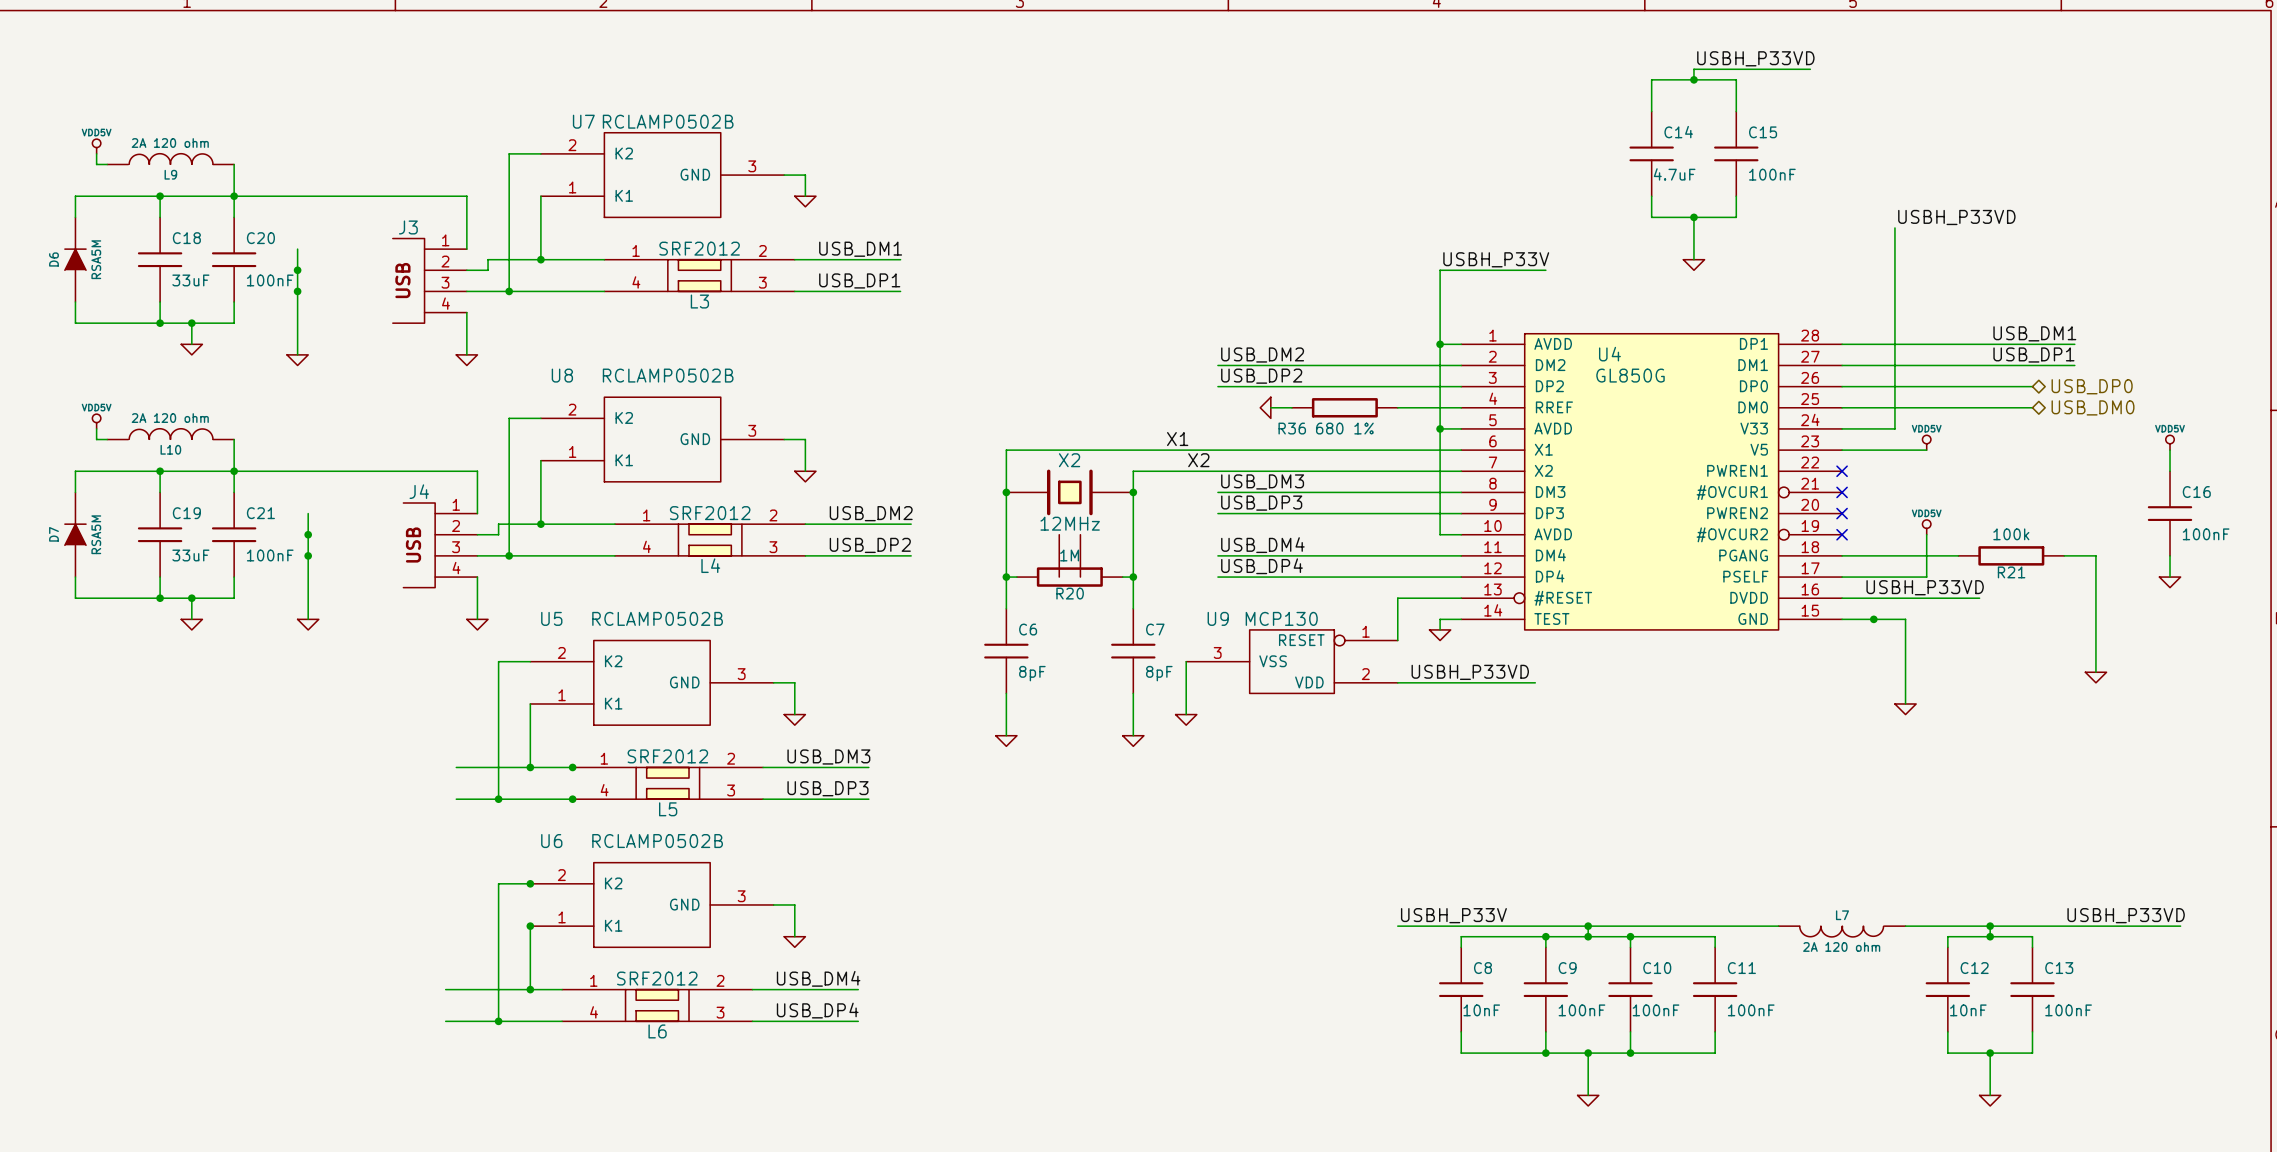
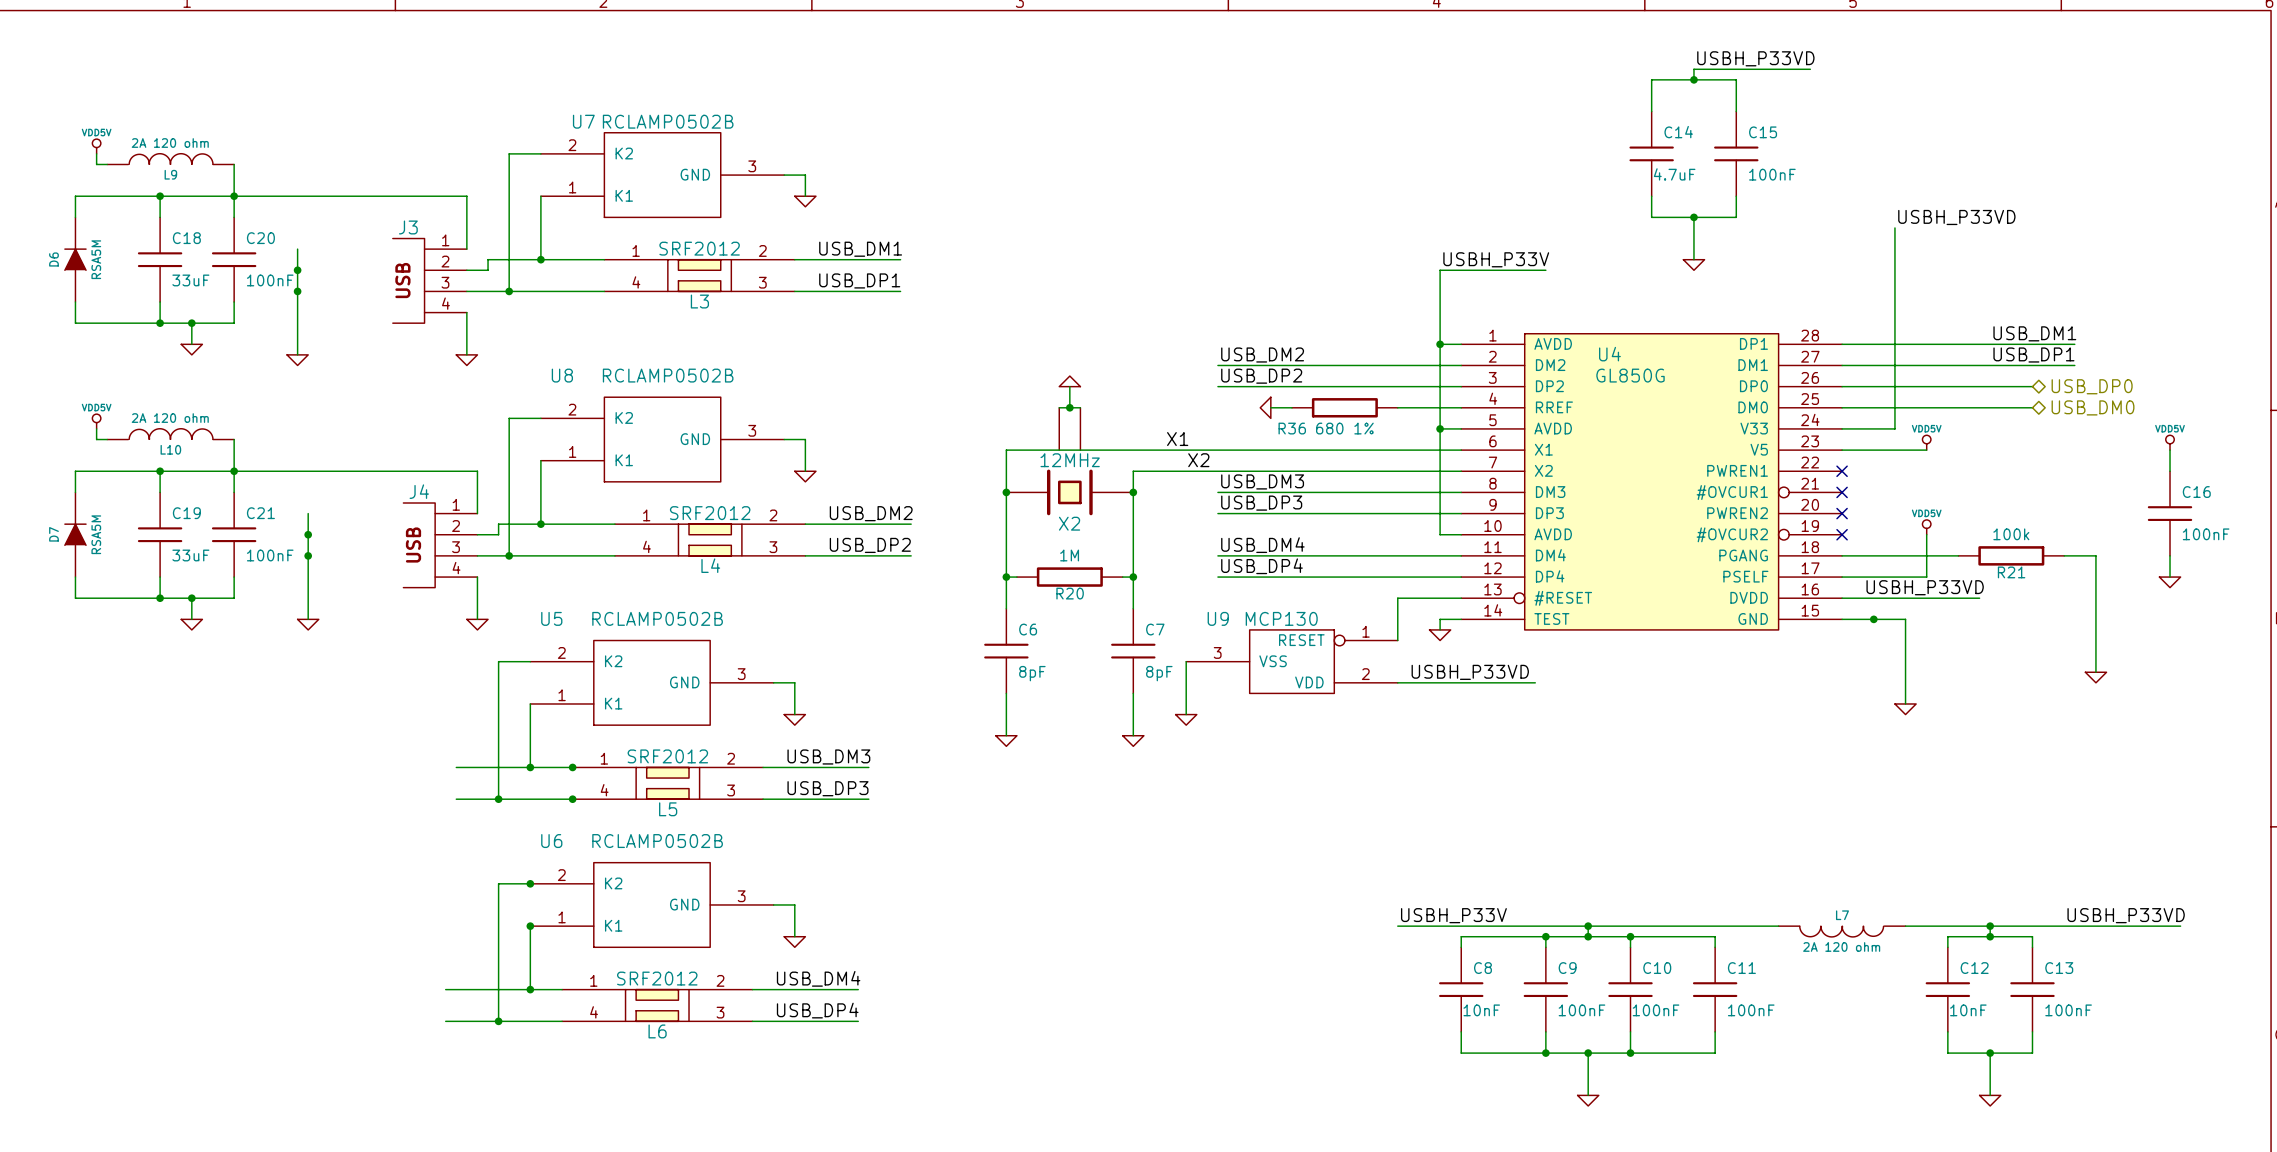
power symbol: none -> (1069, 381)
wire: none -> (1069, 386) (1069, 407)
wire: none -> (1059, 407) (1080, 407)
junction: none -> (1069, 407)
X2 rotation: 0° (1069, 492) -> 180° (1069, 492)

